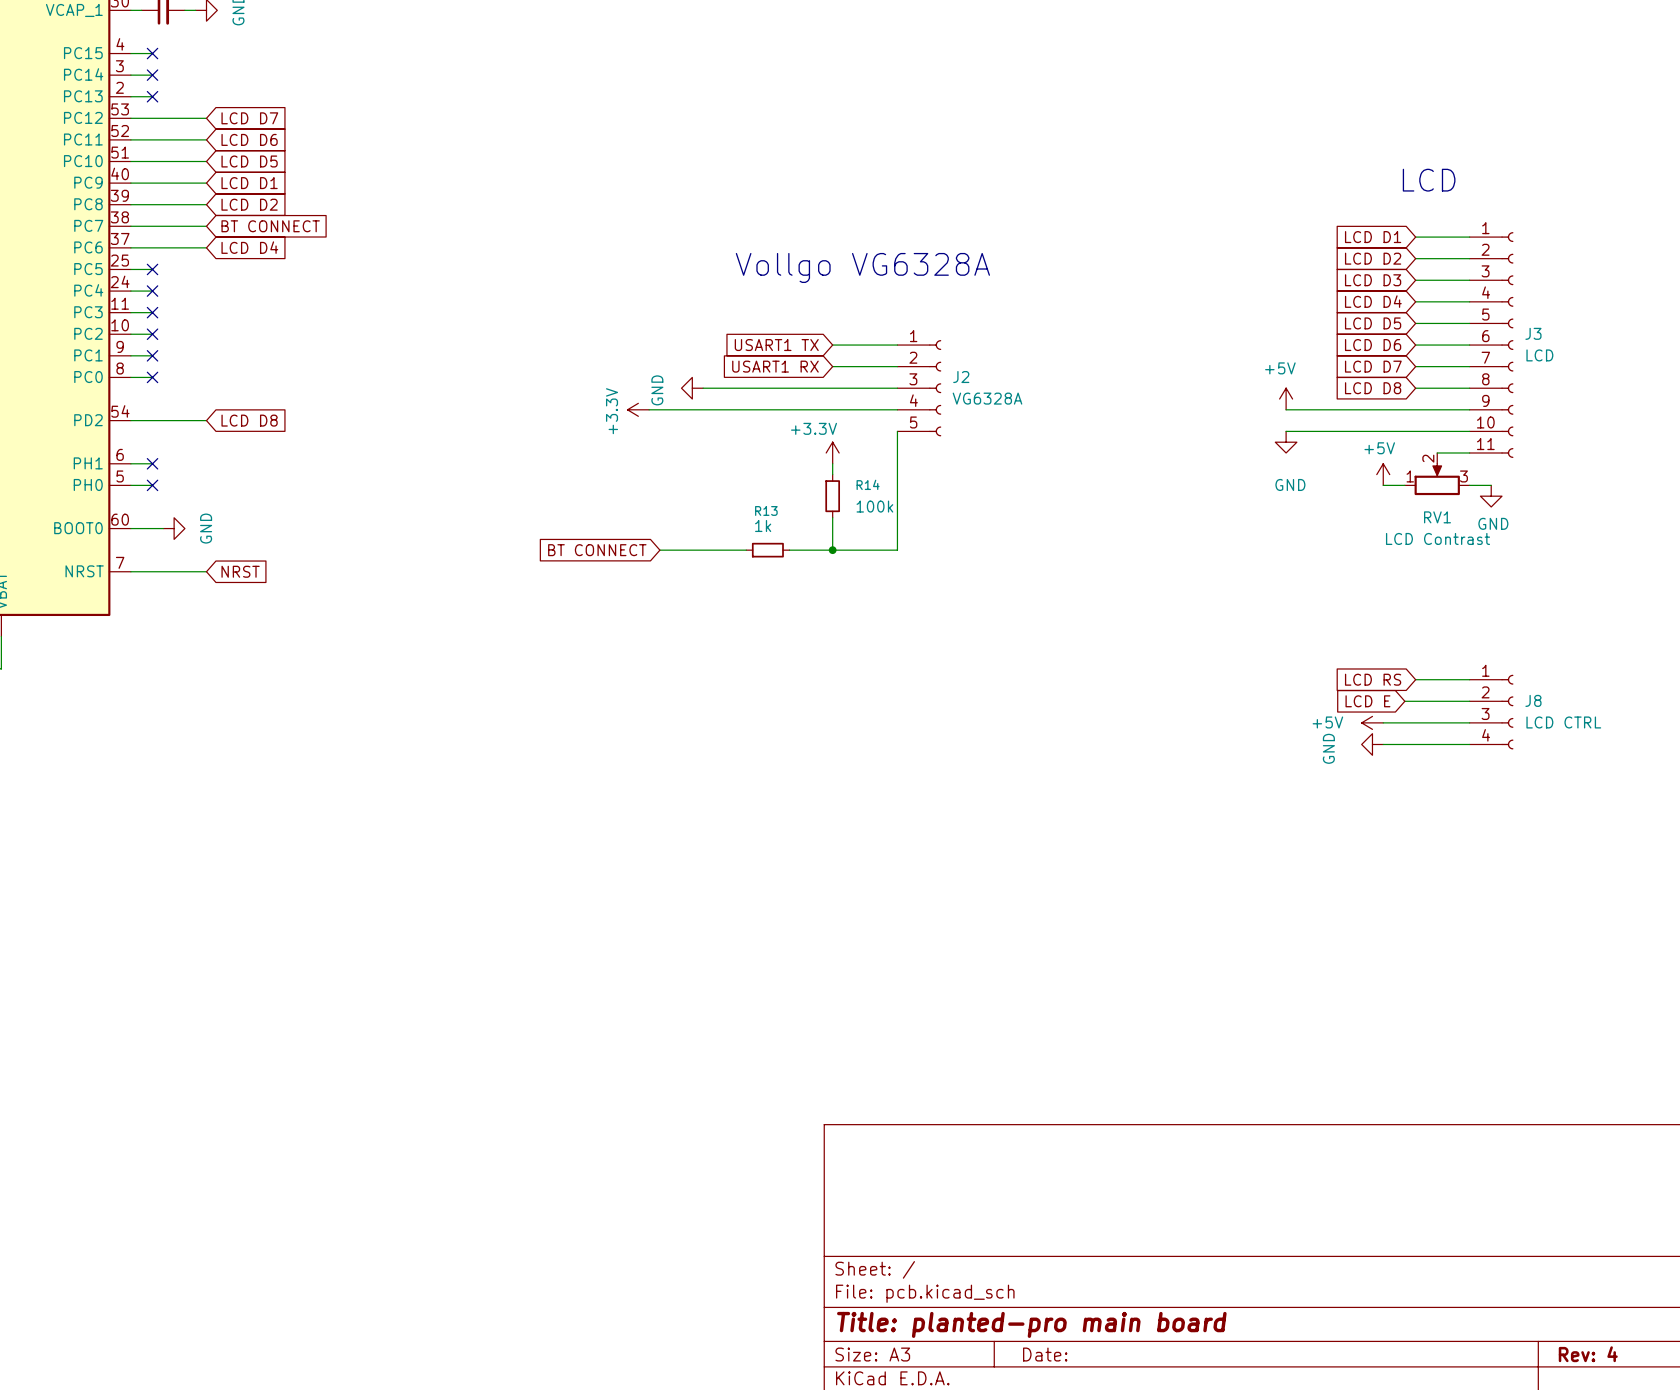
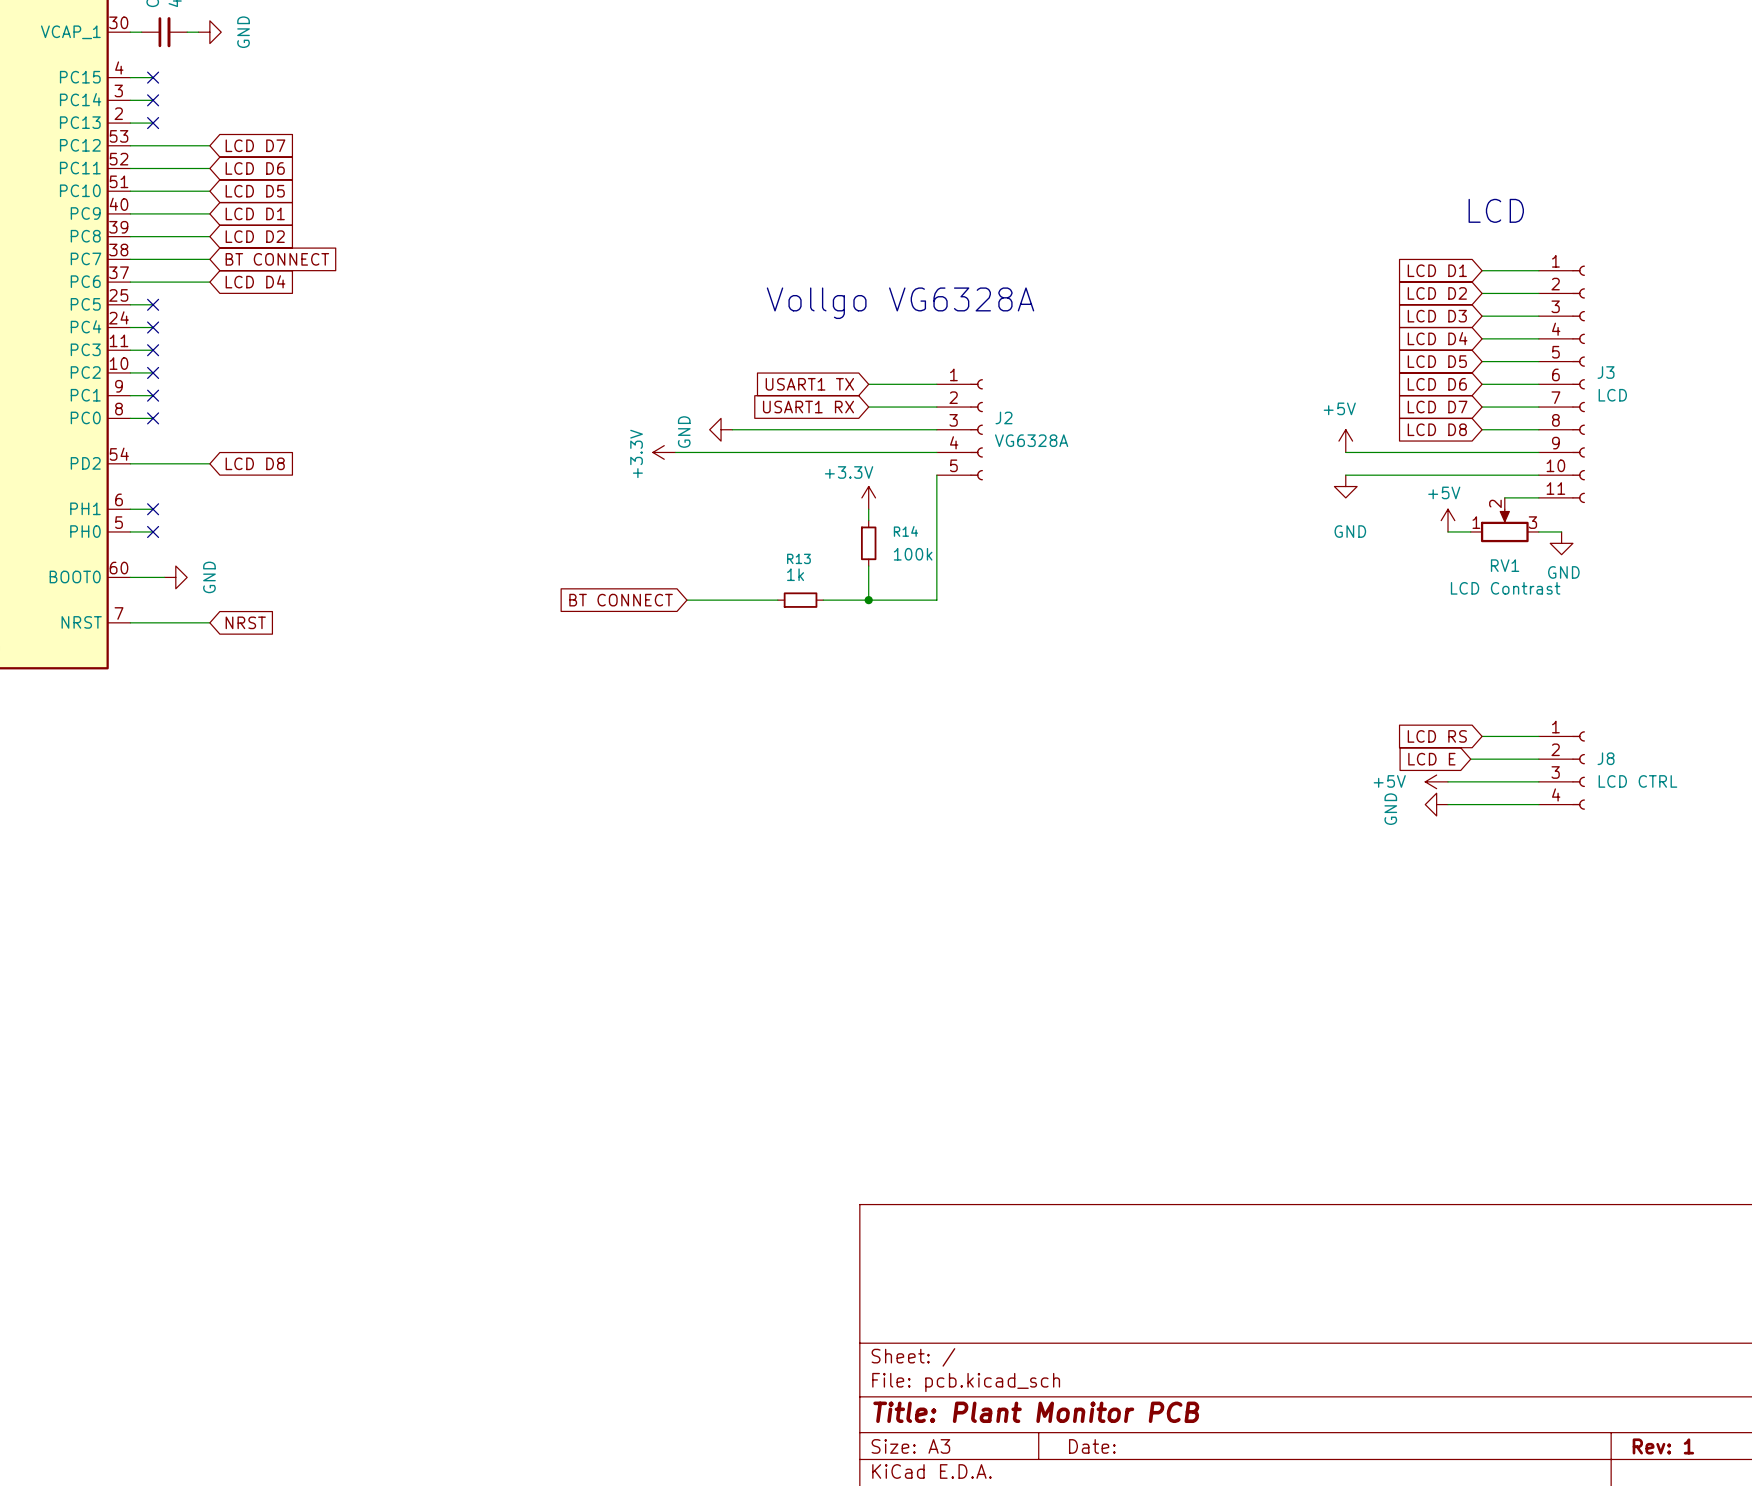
title block: Title: planted-pro main board (1031, 1324) -> Title: Plant Monitor PCB (1036, 1412)
title block: Rev: 4 (1588, 1354) -> Rev: 1 (1663, 1446)

